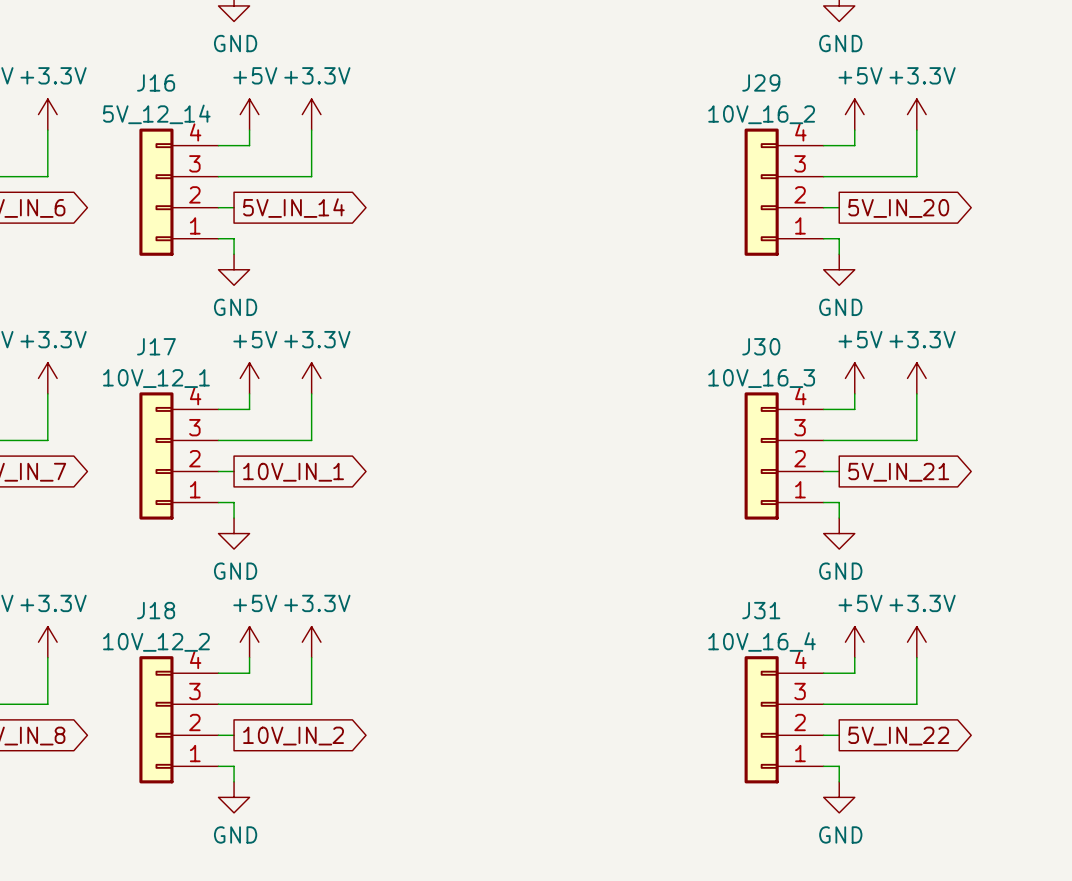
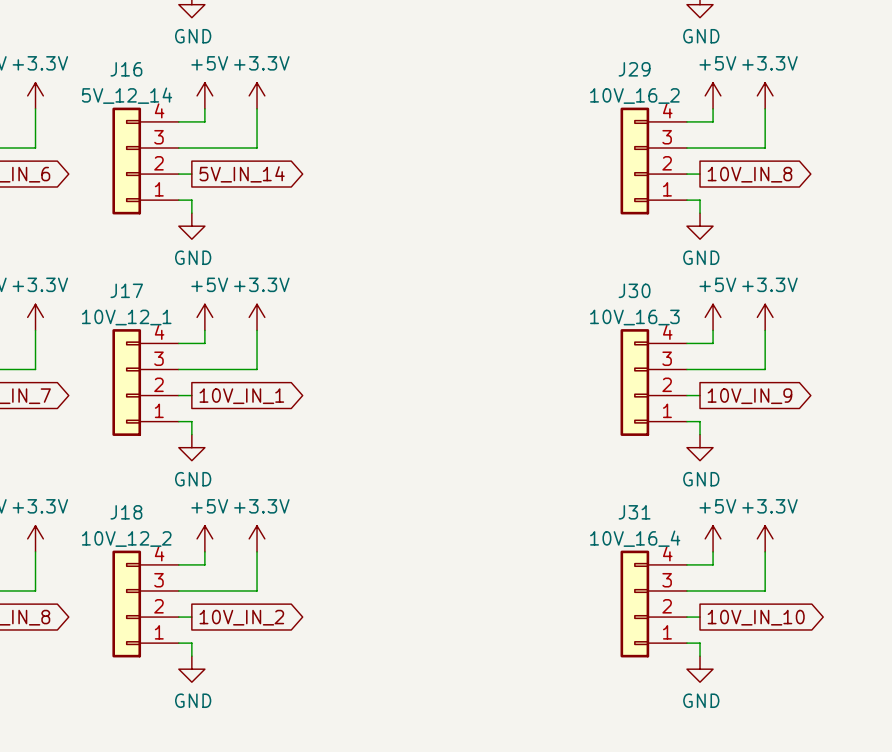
global label: 5V_IN_20 (898, 208) -> 10V_IN_8 (749, 174)
global label: 5V_IN_21 (898, 472) -> 10V_IN_9 (749, 396)
global label: 5V_IN_22 (898, 736) -> 10V_IN_10 (756, 617)

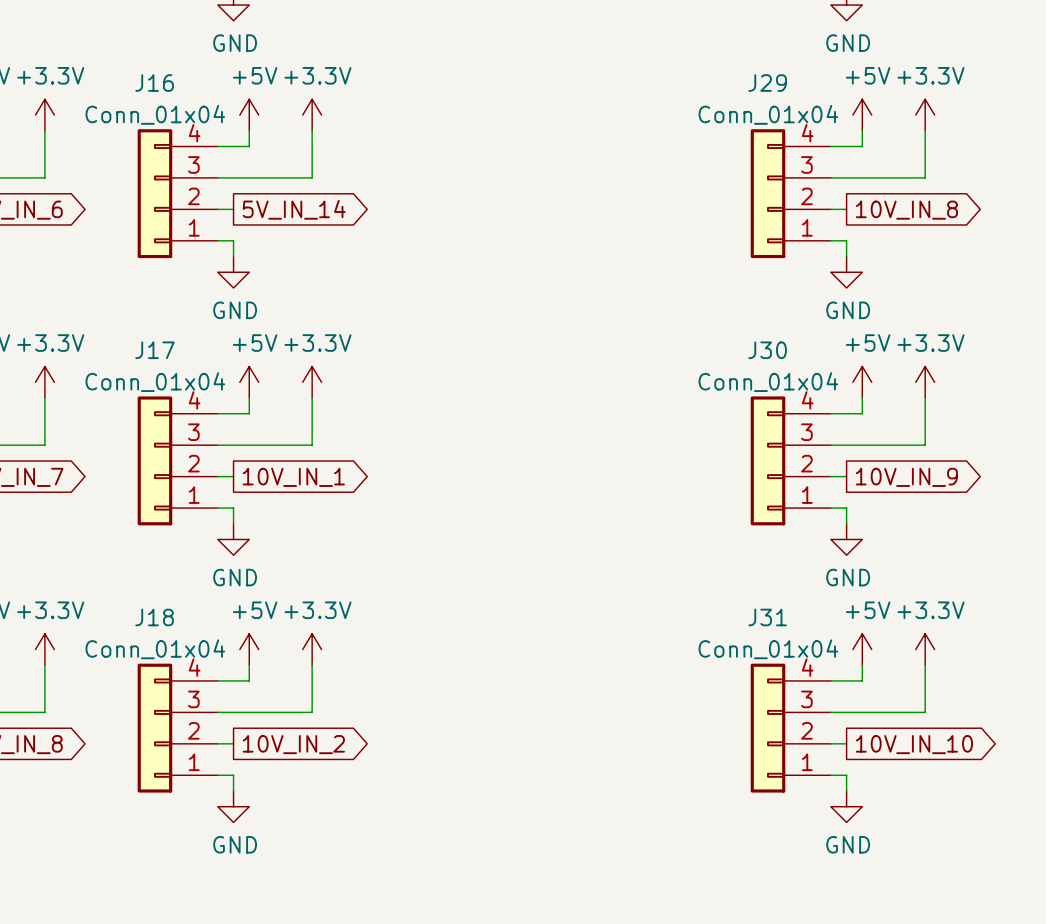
J16 value: 5V_12_14 (127, 95) -> Conn_01x04 (155, 114)
J29 value: 10V_16_2 (634, 96) -> Conn_01x04 (768, 114)
J17 value: 10V_12_1 (126, 317) -> Conn_01x04 (155, 382)
J30 value: 10V_16_3 (634, 317) -> Conn_01x04 (768, 382)
J31 value: 10V_16_4 (635, 538) -> Conn_01x04 (768, 649)
J18 value: 10V_12_2 (126, 539) -> Conn_01x04 (155, 649)

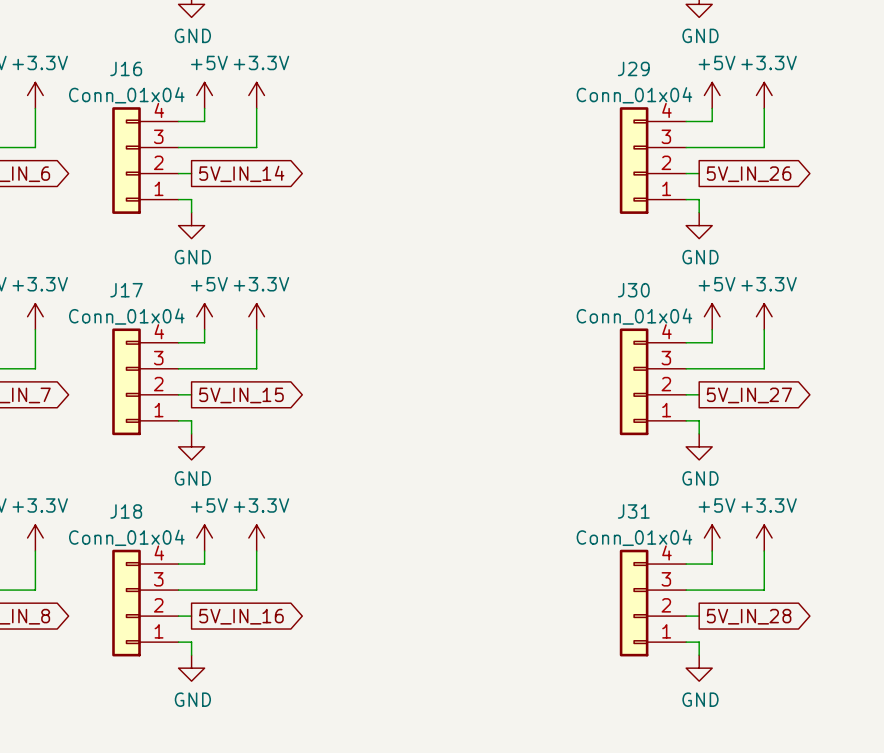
global label: 10V_IN_8 (906, 210) -> 5V_IN_26 (749, 174)
global label: 10V_IN_1 (293, 477) -> 5V_IN_15 (241, 395)
global label: 10V_IN_9 (906, 477) -> 5V_IN_27 (749, 395)
global label: 10V_IN_2 (293, 744) -> 5V_IN_16 (241, 616)
global label: 10V_IN_10 (914, 744) -> 5V_IN_28 (749, 616)

